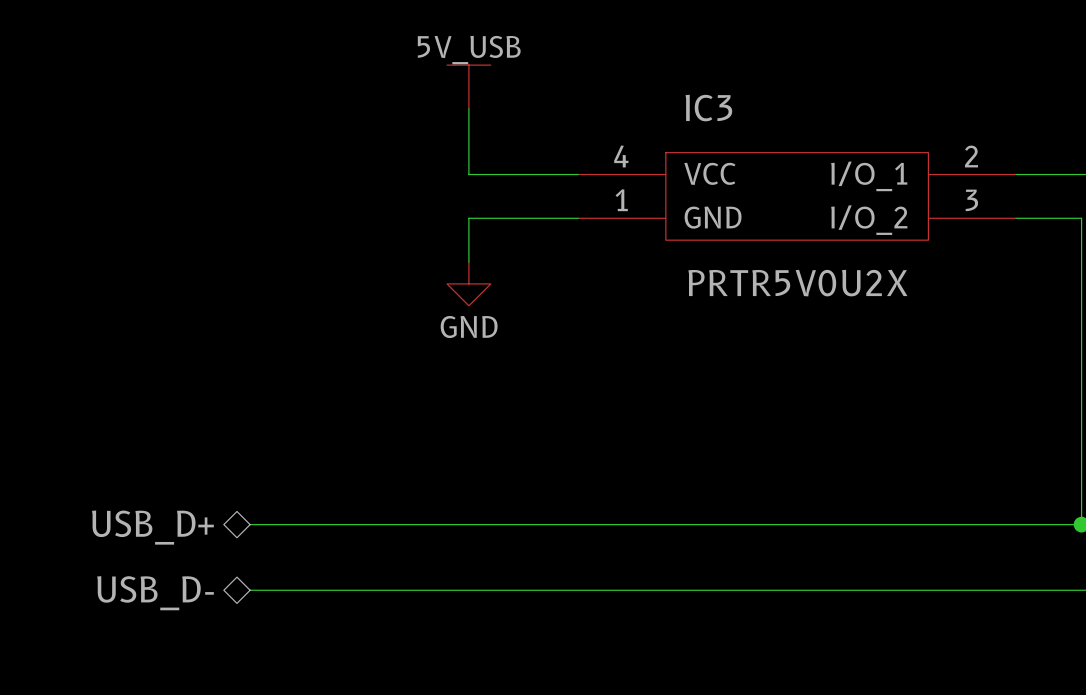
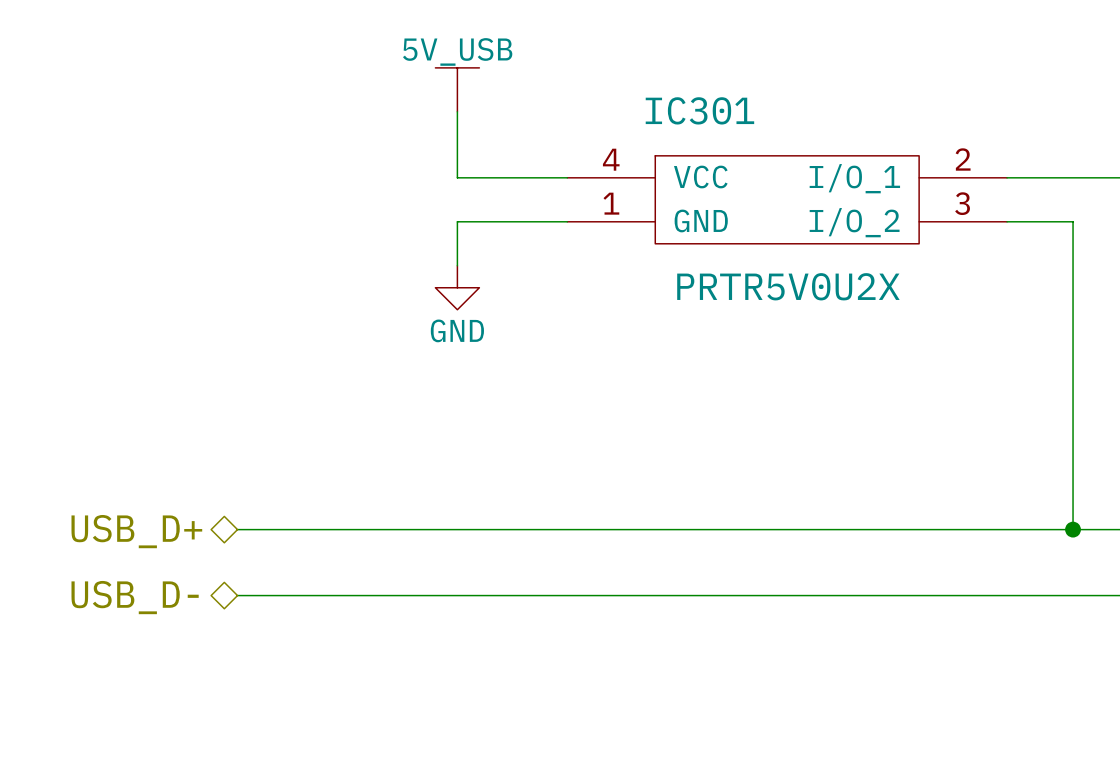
IC3 name: IC3 (708, 108) -> IC301 (699, 110)

